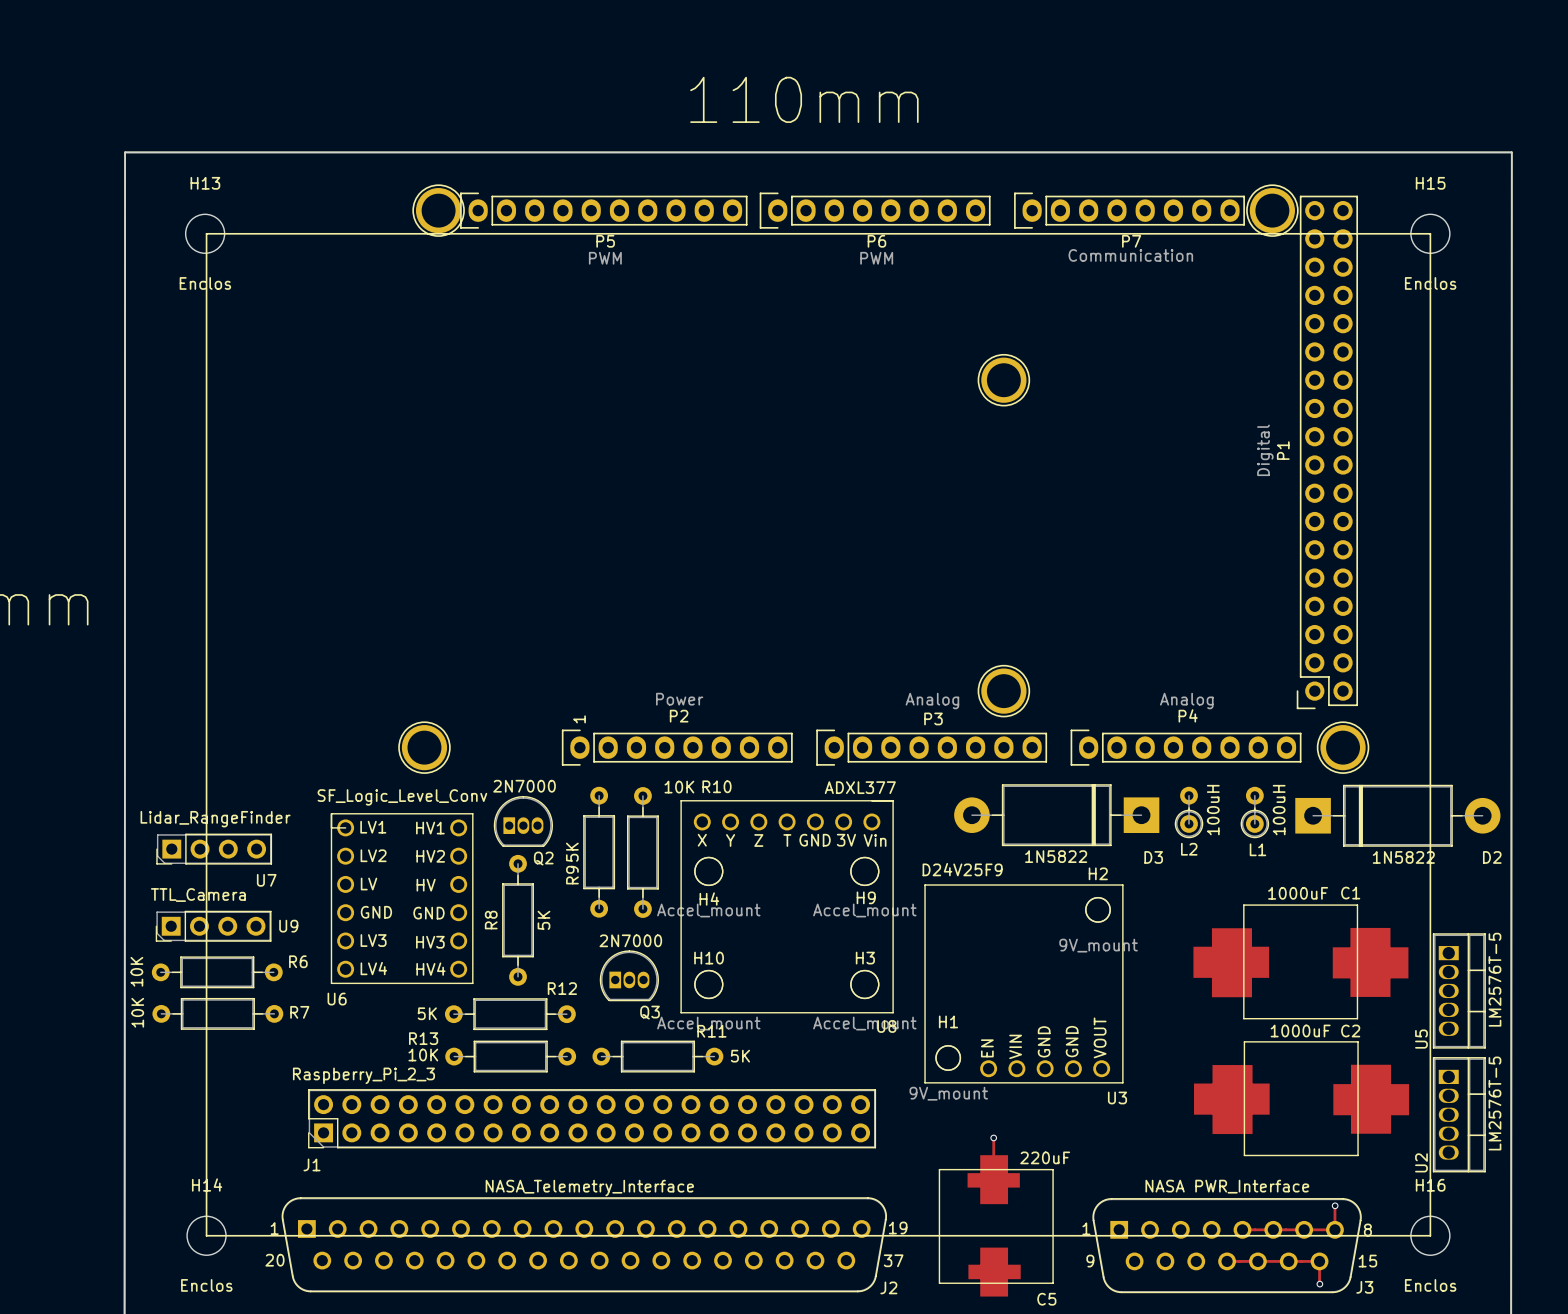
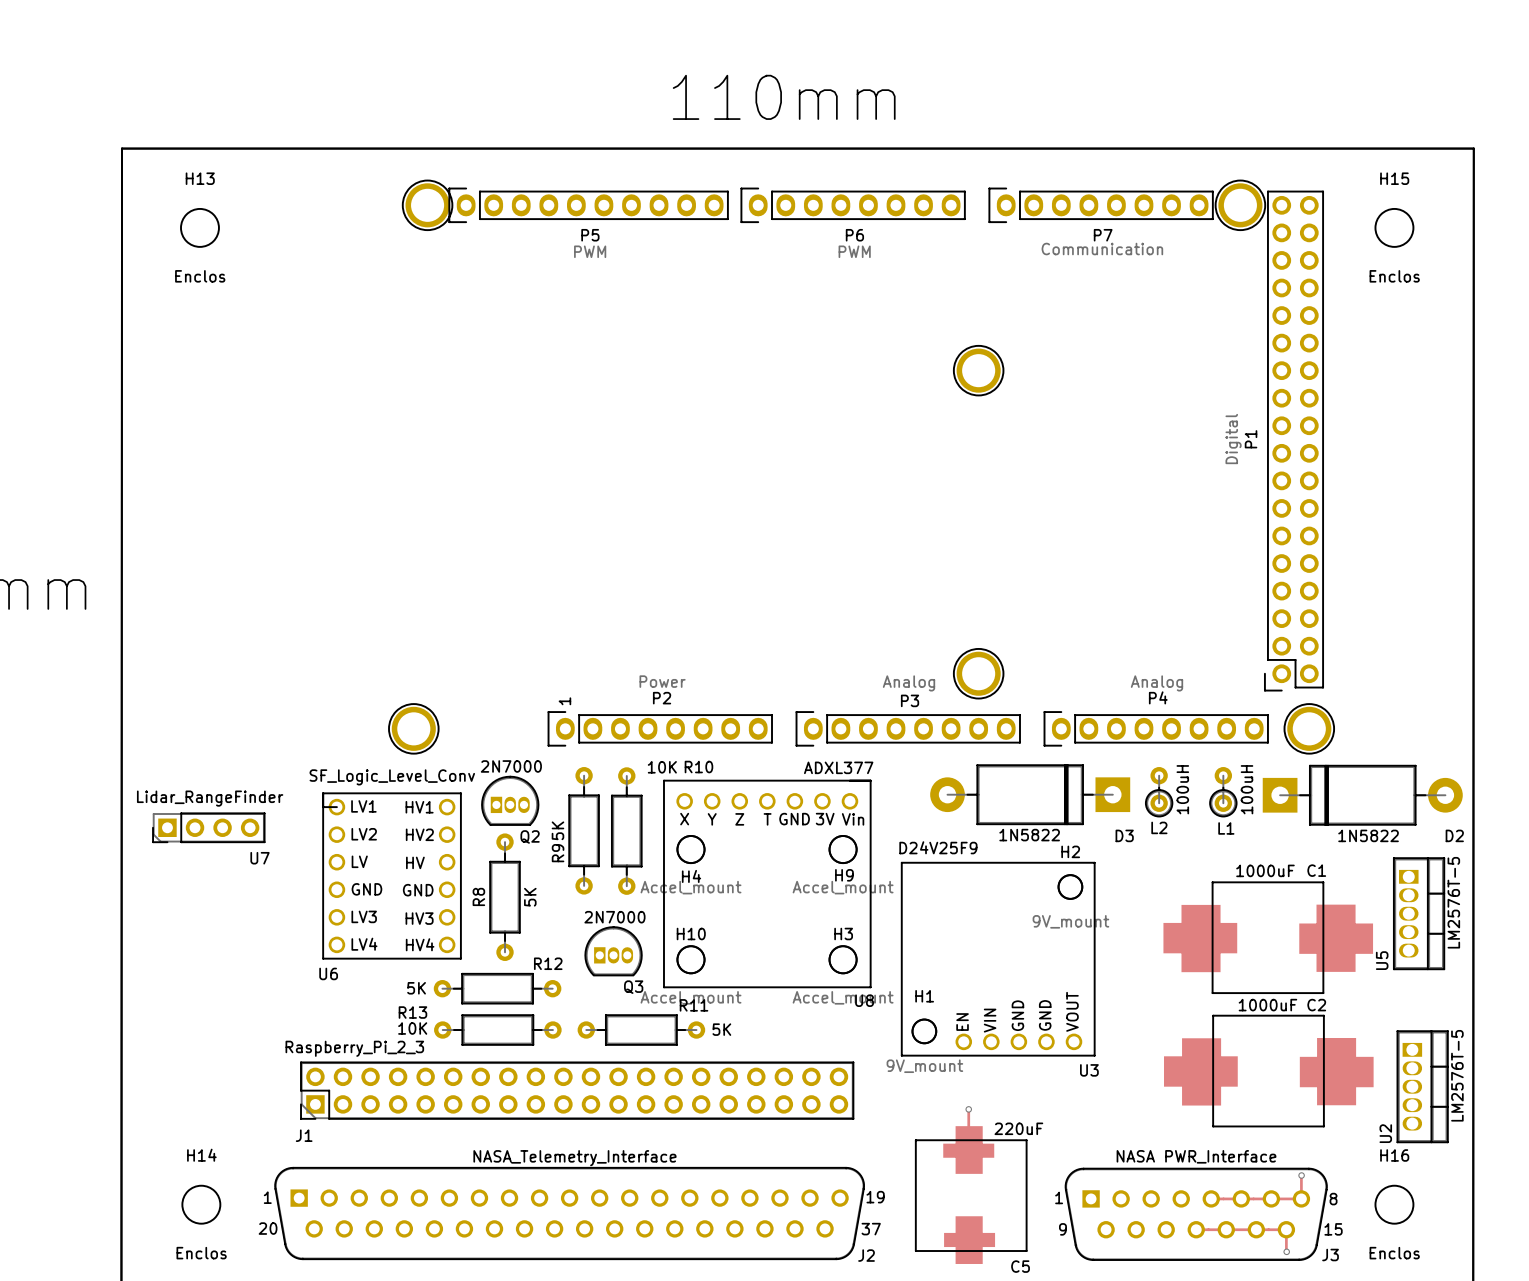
line: (206, 233) (206, 1235) (1430, 1235) (1430, 233) (206, 233) -> none
U9: TTL_Camera (213, 926) -> none
R6: 10K (217, 972) -> none
U5 position: (1459, 990) -> (1419, 913)
R7: 10K (217, 1013) -> none

